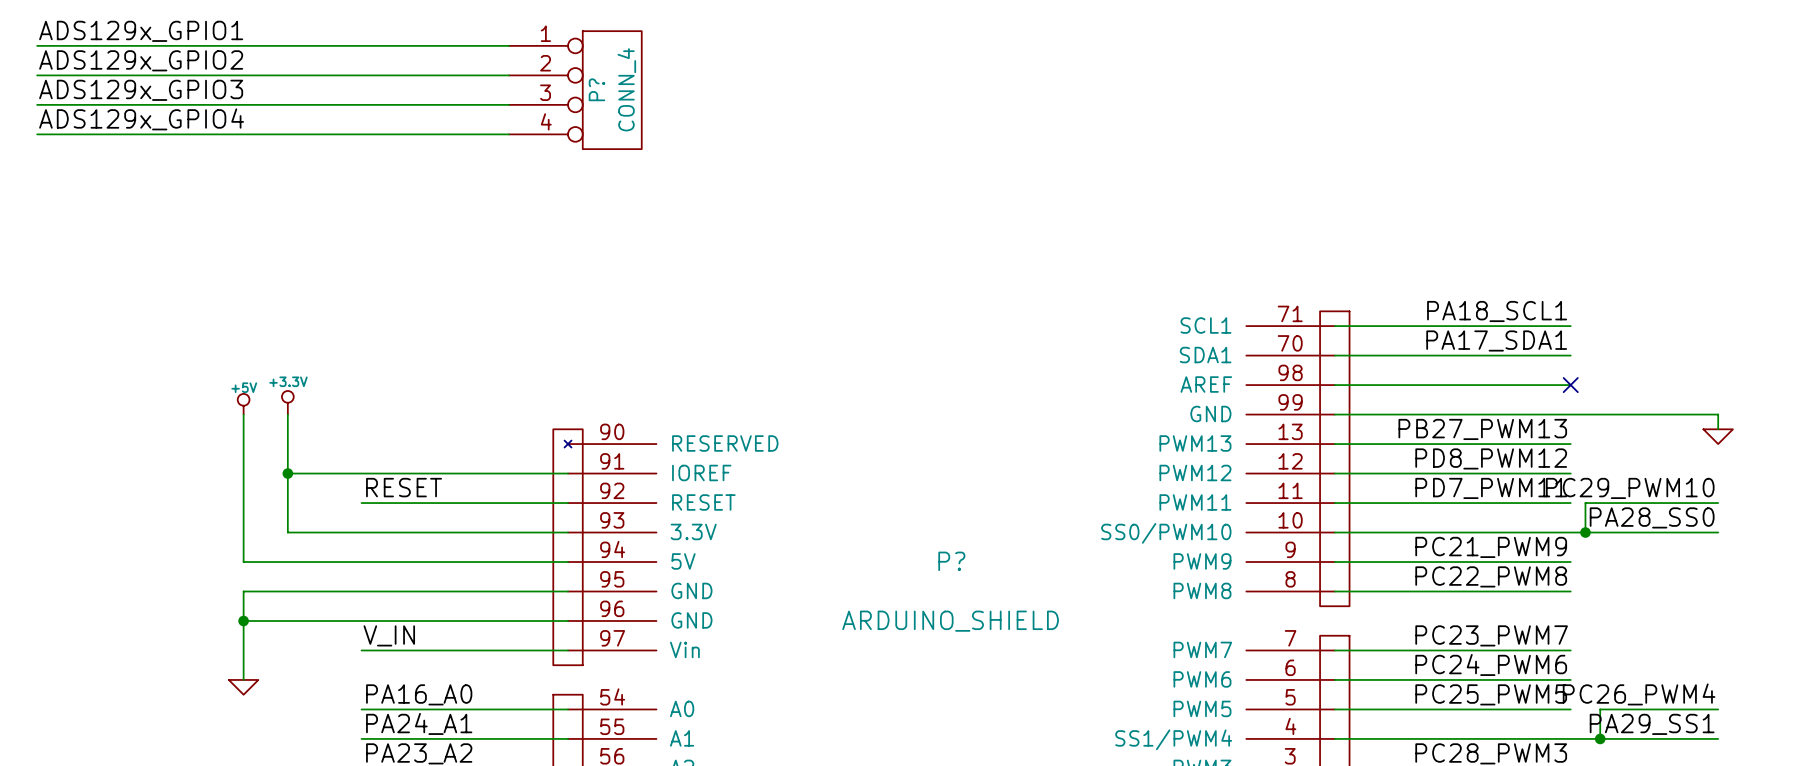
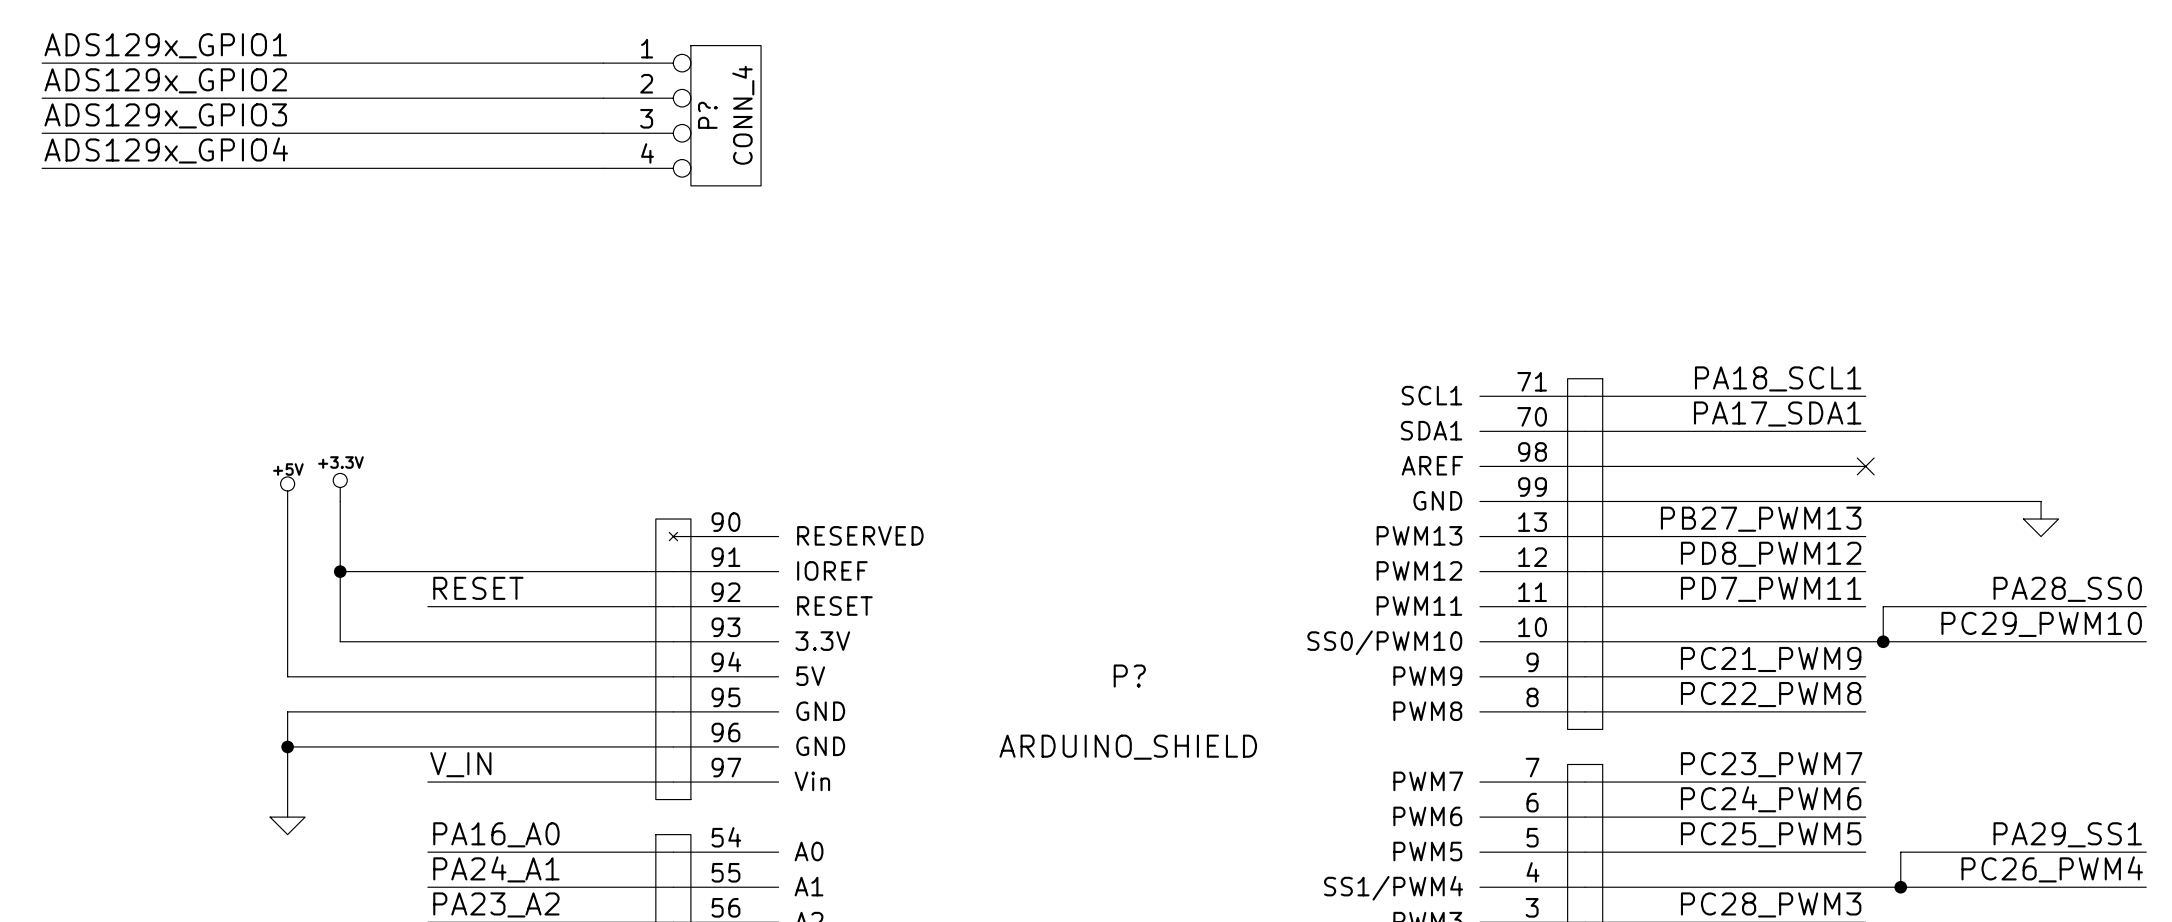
label position: PC29_PWM10 (1630, 488) -> PC29_PWM10 (2041, 624)
wire: none -> (2041, 606) (2146, 606)
label position: PA28_SS0 (1652, 517) -> PA28_SS0 (2067, 589)
wire: none -> (2041, 641) (2146, 641)
label position: PC26_PWM4 (1639, 694) -> PC26_PWM4 (2052, 869)
wire: none -> (2041, 852) (2146, 852)
label position: PA29_SS1 (1652, 724) -> PA29_SS1 (2067, 834)
wire: none -> (2041, 887) (2146, 887)

